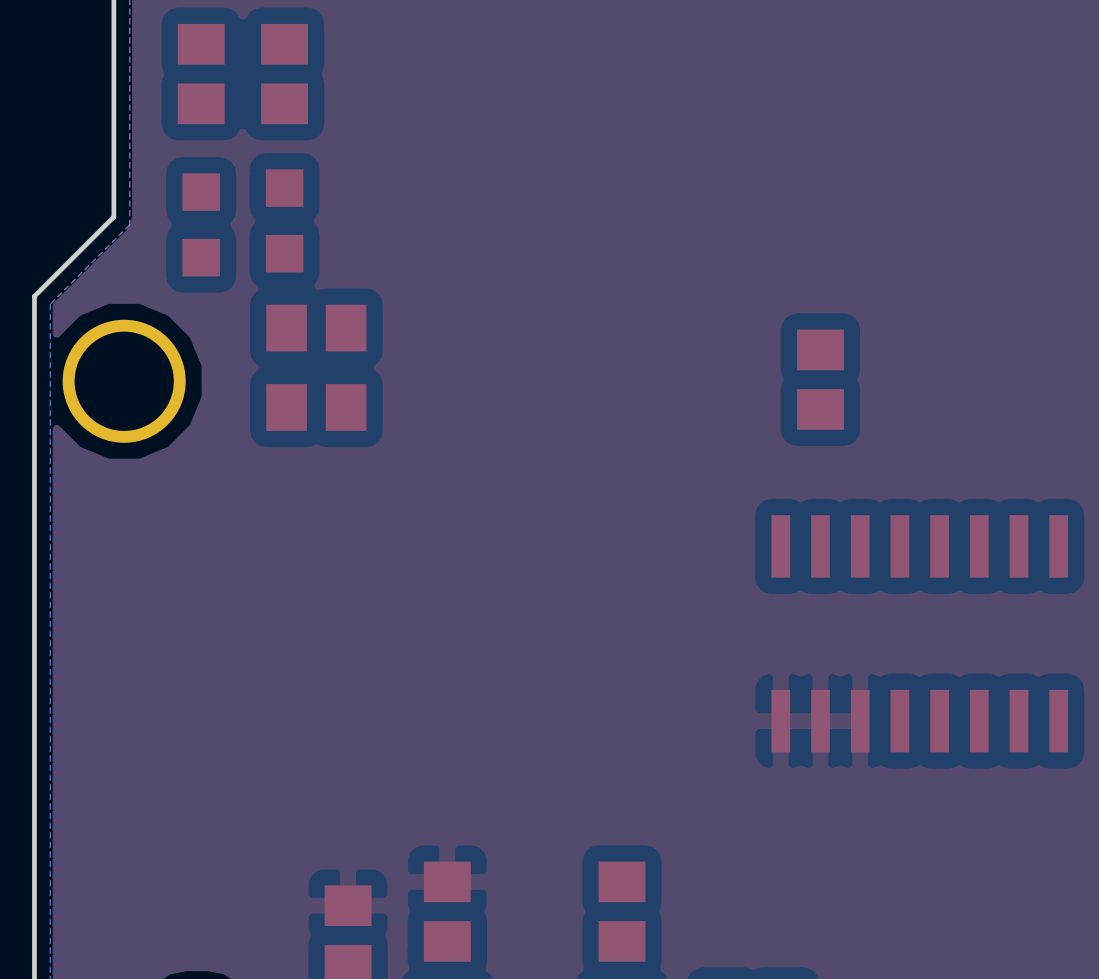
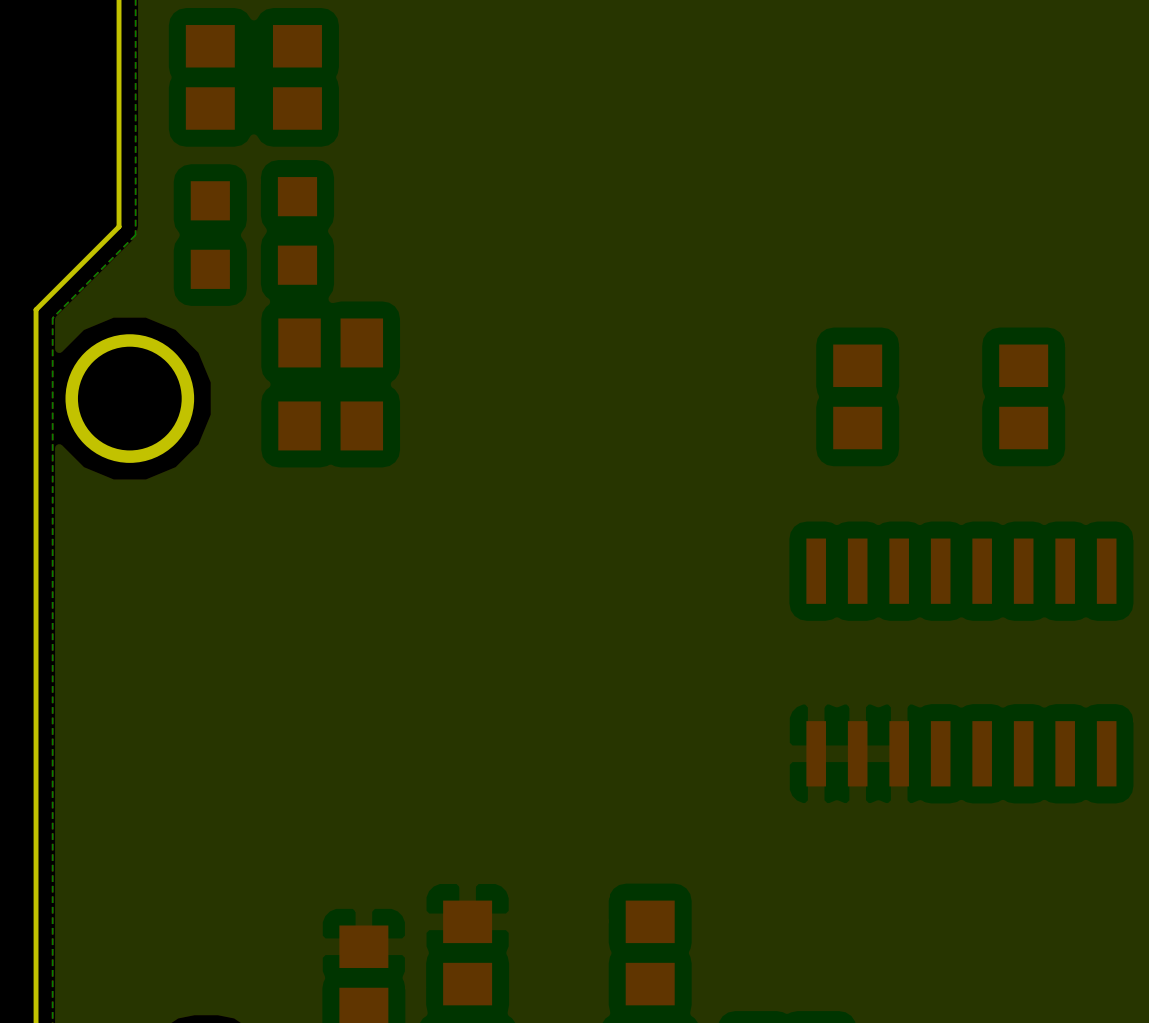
part: none -> (1023, 396)

